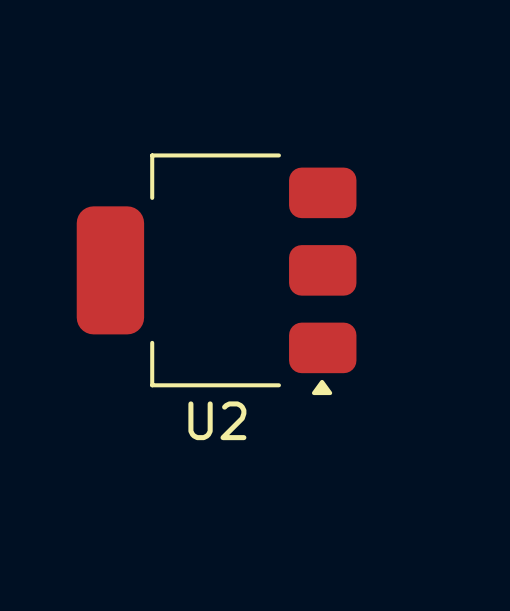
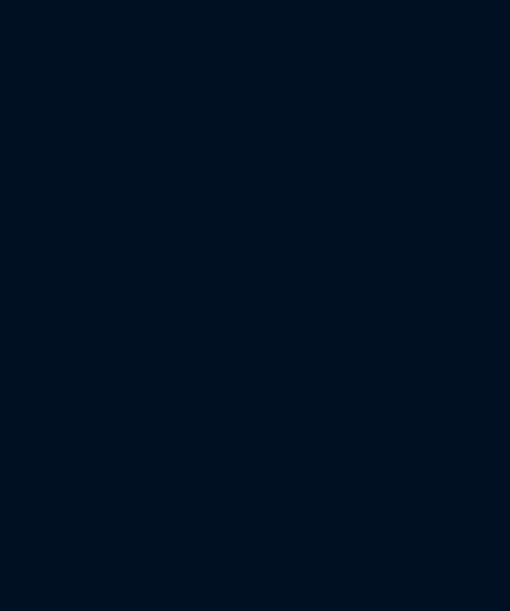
U2: (216, 274) -> none

